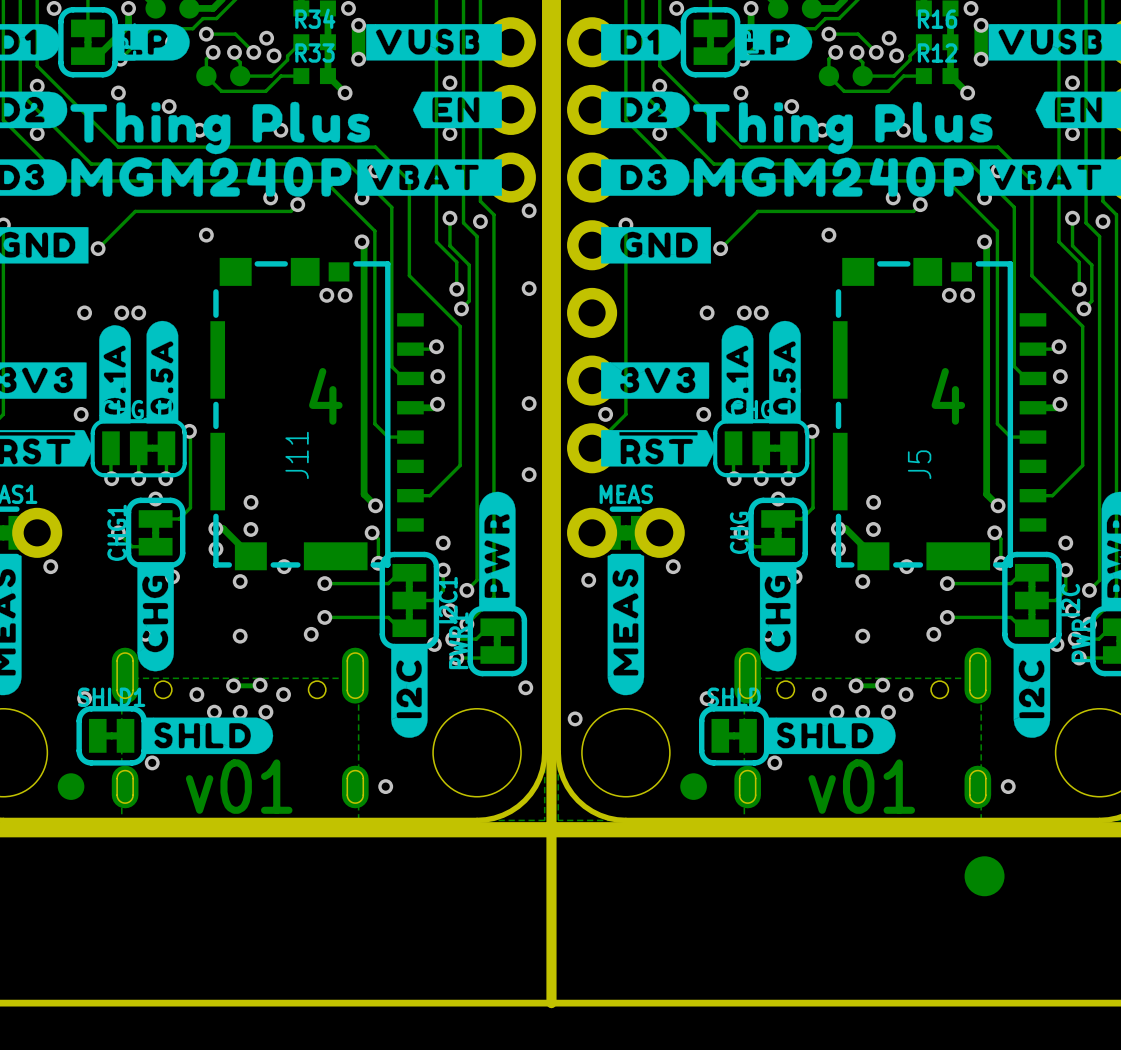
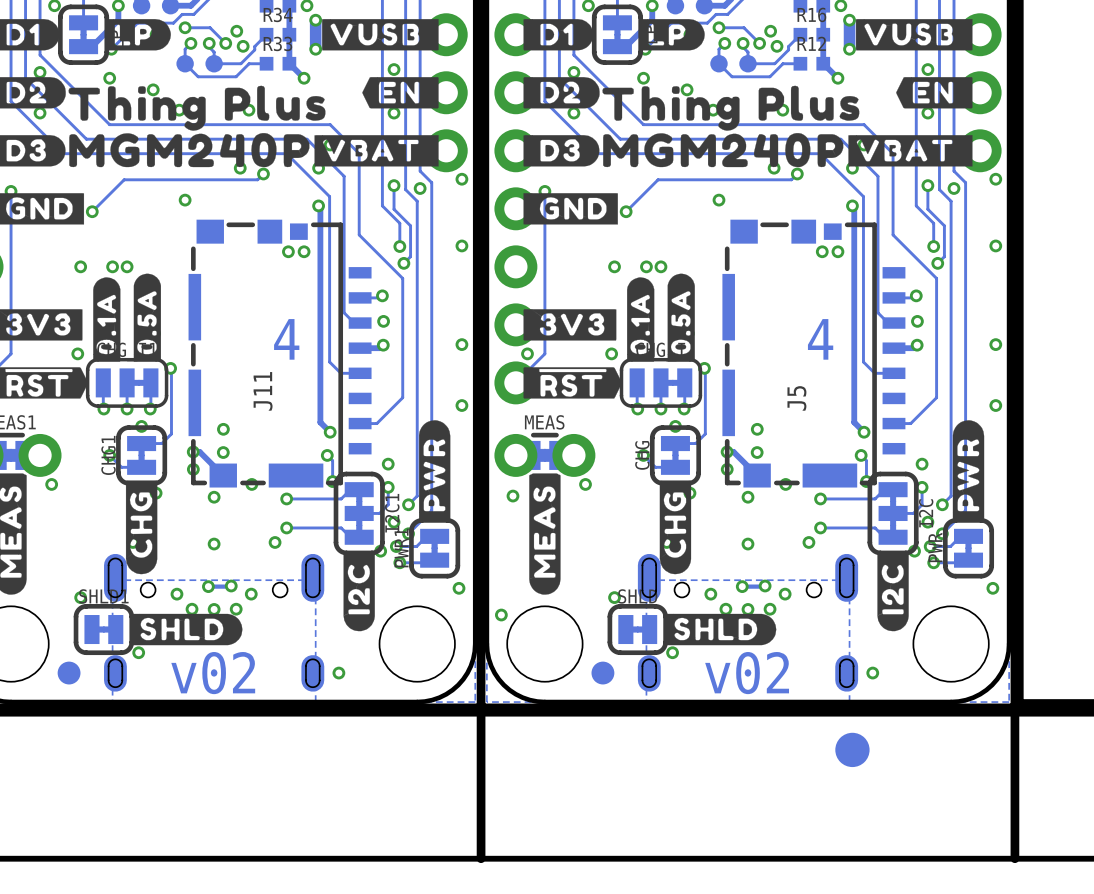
text: v01 (239, 786) -> v02 (213, 673)
text: v01 (861, 786) -> v02 (747, 673)

